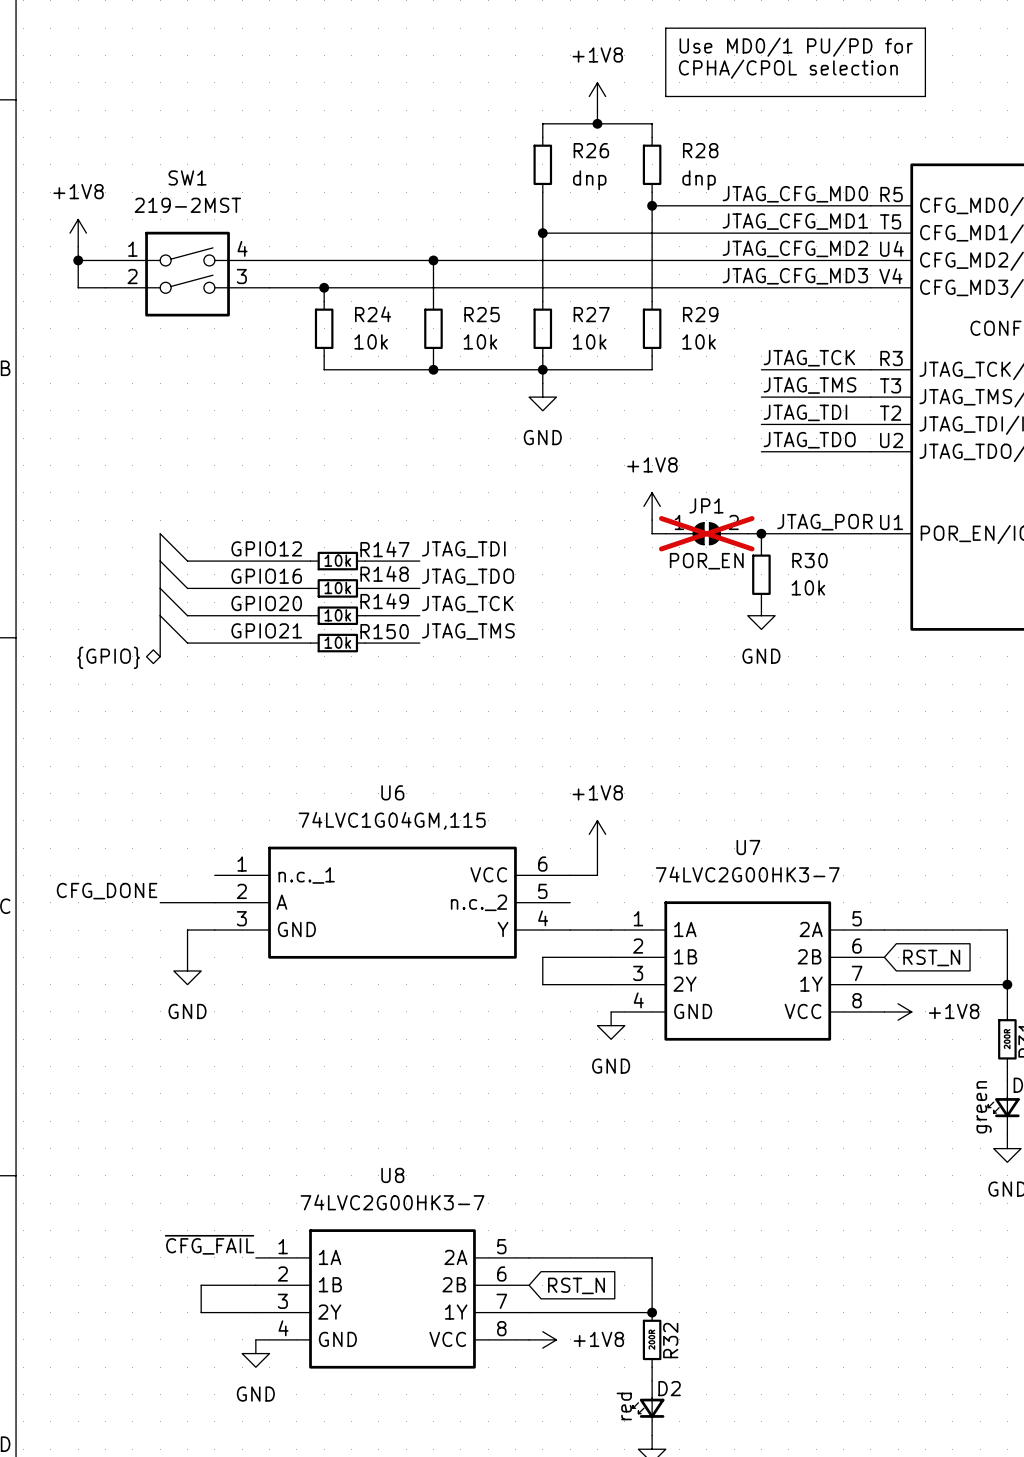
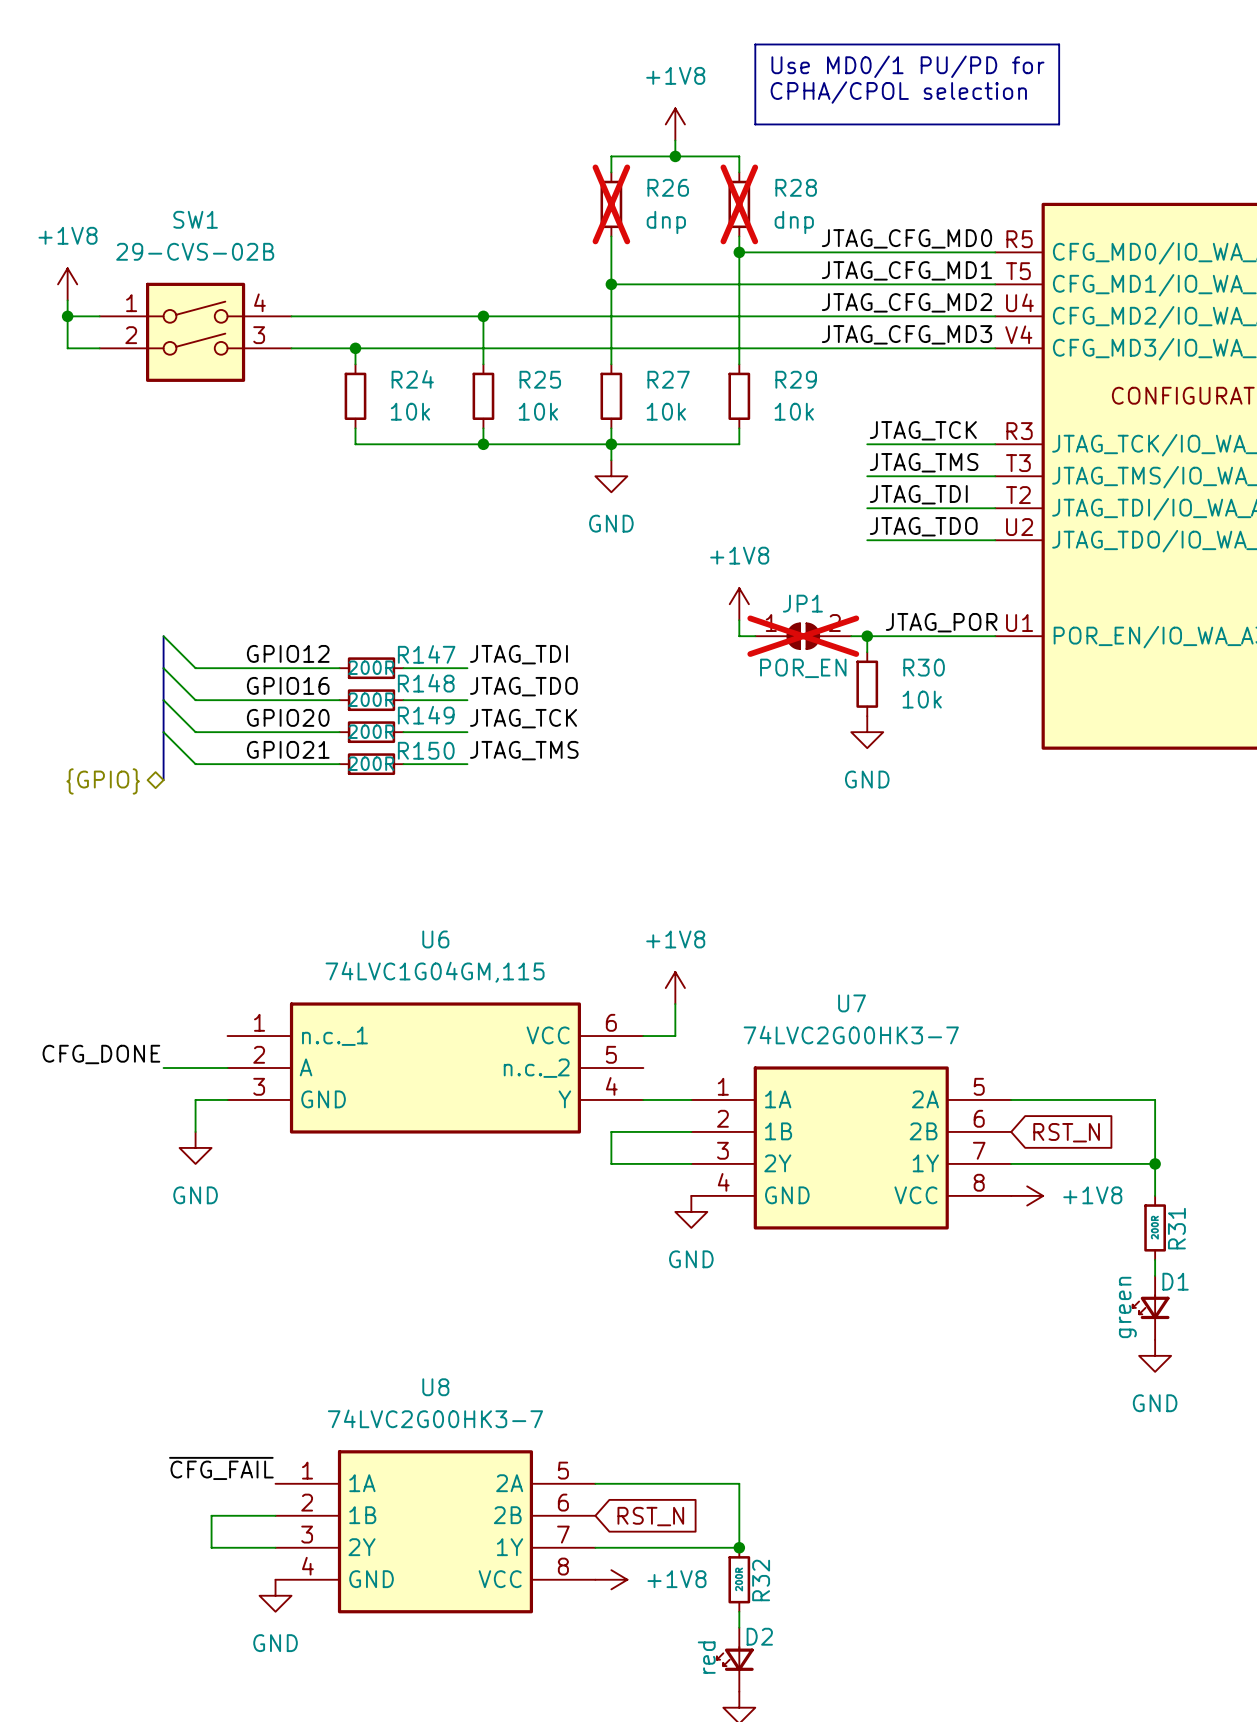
R26 do-not-place cross: none -> (611, 204)
R28 do-not-place cross: none -> (739, 204)
SW1 value: 219-2MST (187, 205) -> 29-CVS-02B (195, 251)
R147 value: 10k (337, 560) -> 200R (371, 667)
R148 value: 10k (337, 587) -> 200R (371, 699)
R149 value: 10k (337, 615) -> 200R (371, 731)
R150 value: 10k (337, 642) -> 200R (371, 763)

